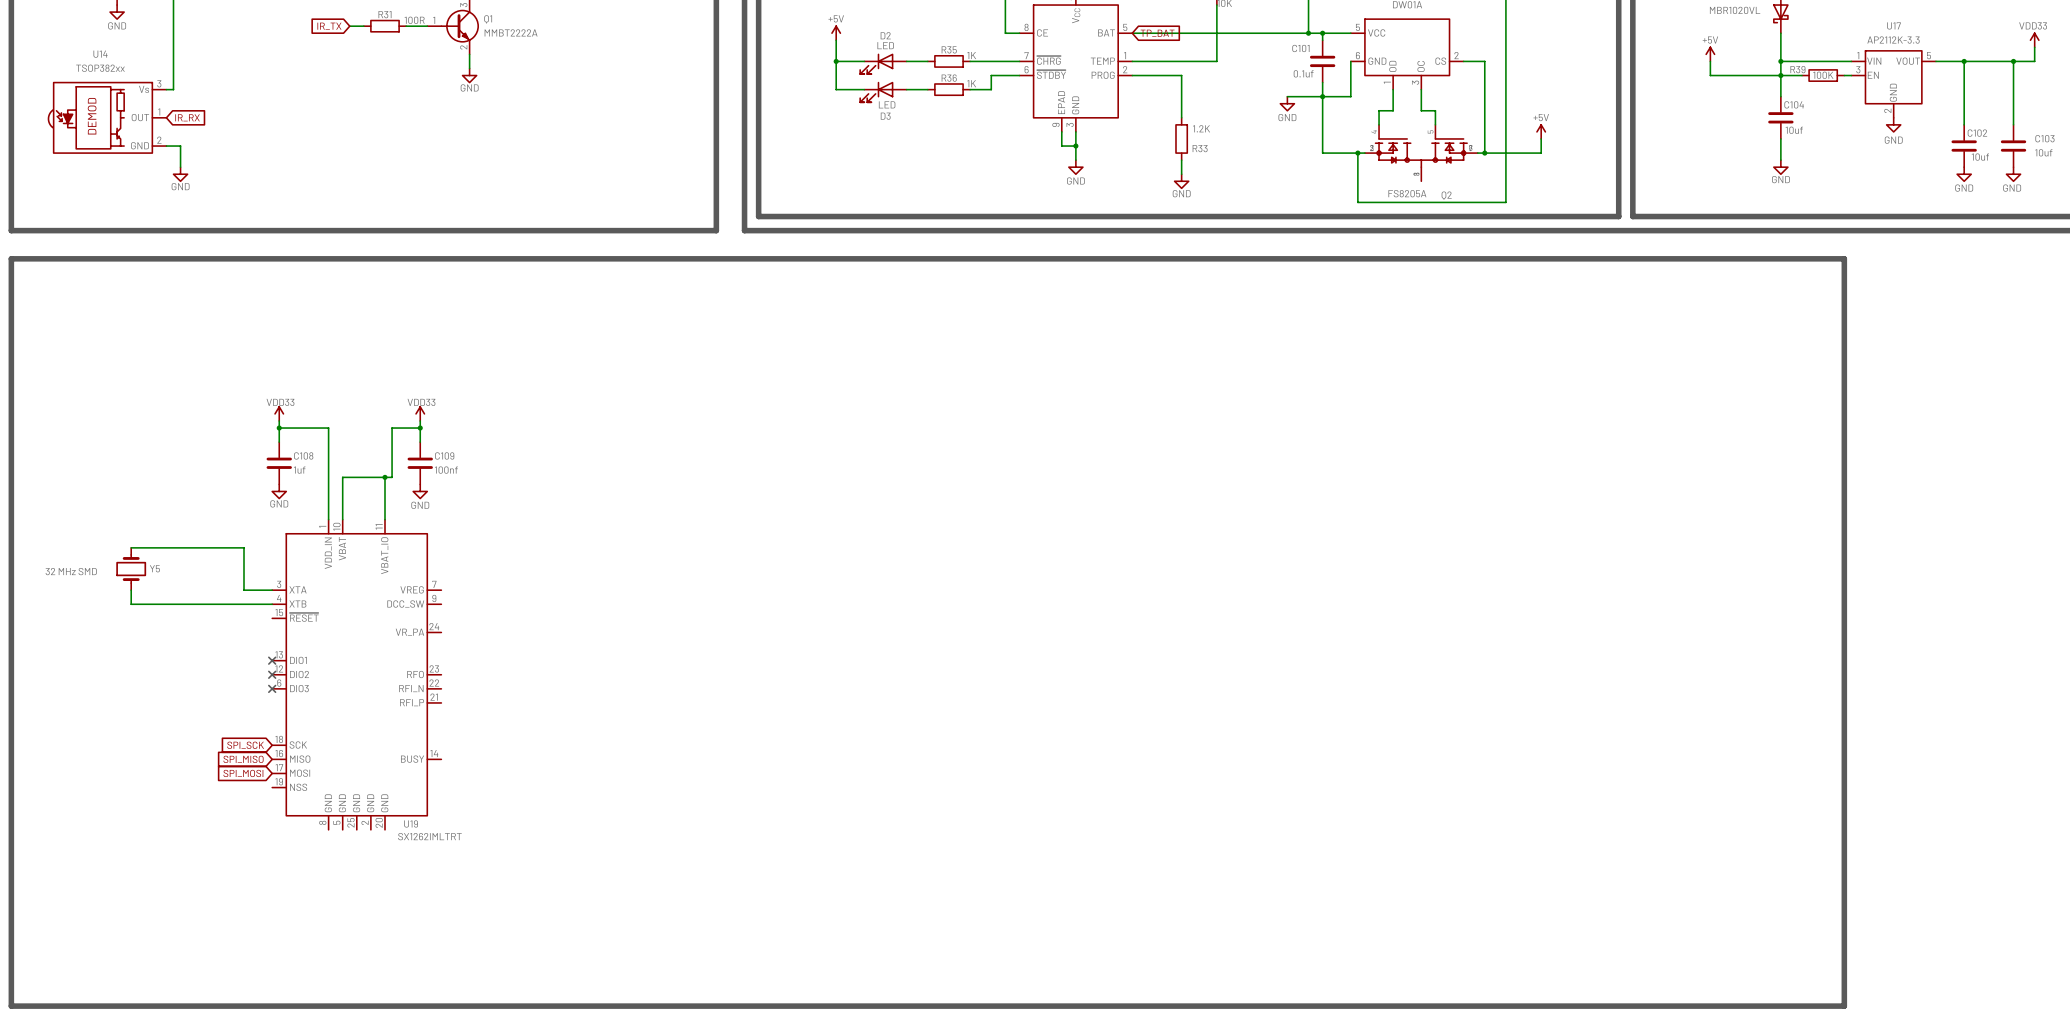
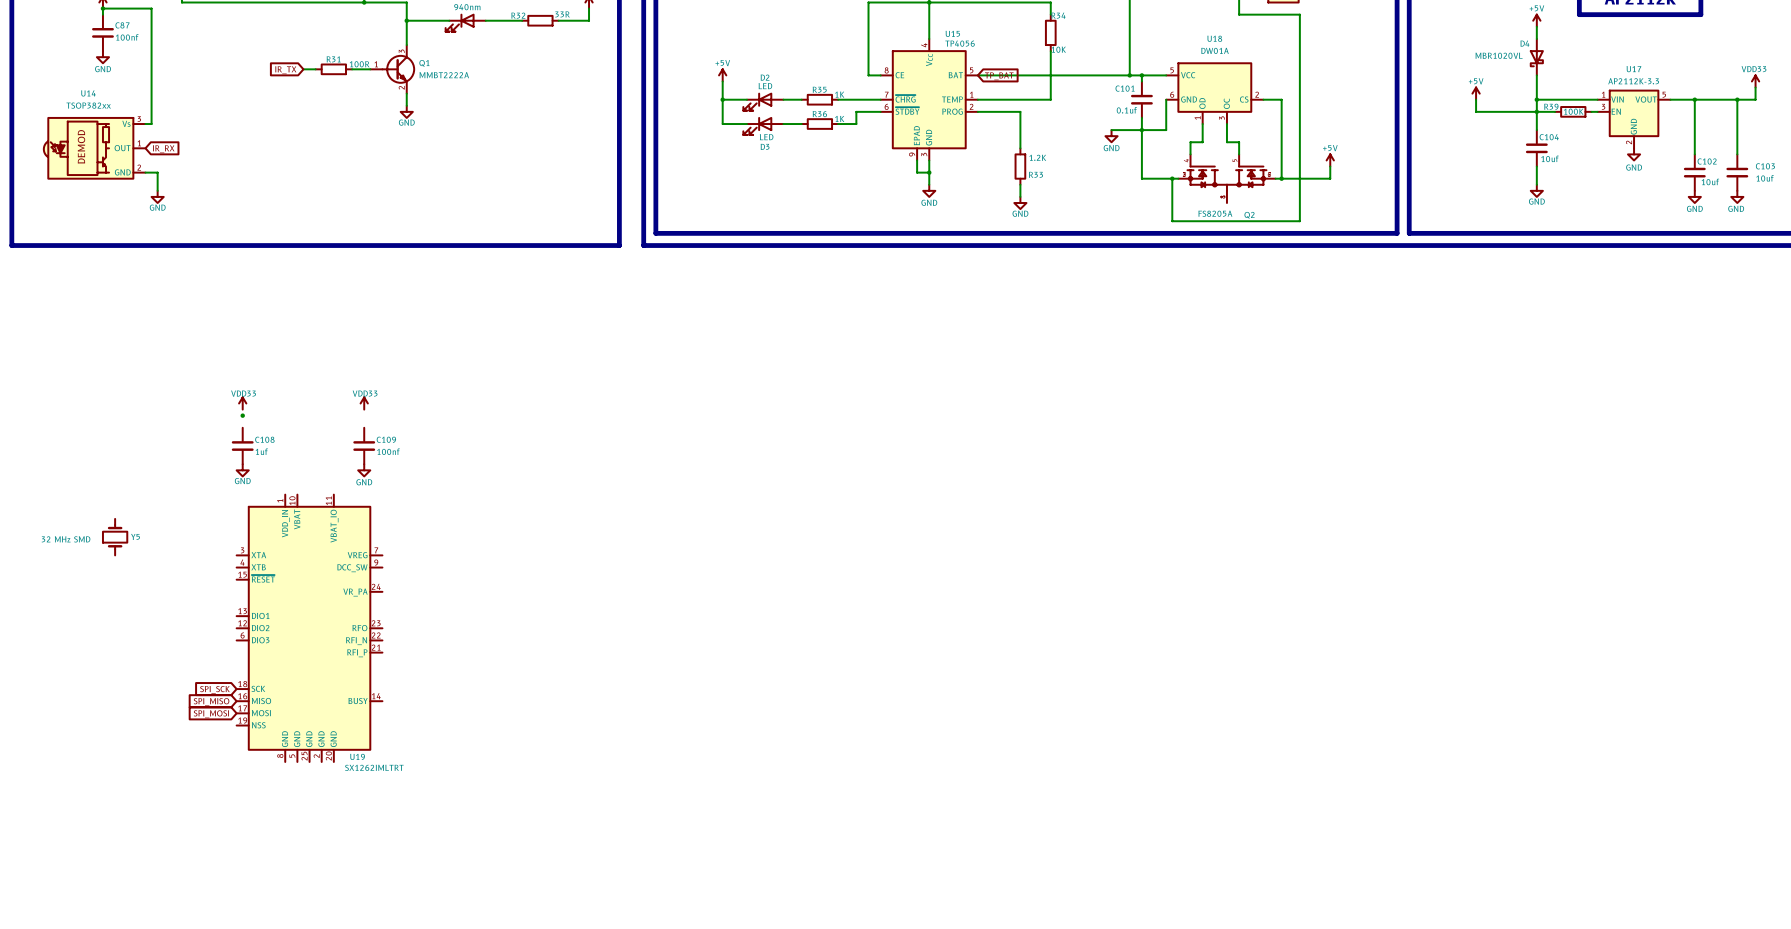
line: (11, 258) (11, 1006) (1844, 1006) (1844, 258) (11, 258) -> none
wire: (279, 420) (279, 442) -> none
wire: (420, 420) (420, 442) -> none
wire: (279, 428) (328, 428) (328, 519) -> none
wire: (420, 428) (392, 428) (392, 477) (342, 477) (342, 519) -> none
junction: (420, 428) -> none
wire: (384, 477) (384, 519) -> none
junction: (384, 477) -> none
wire: (131, 547) (244, 547) (244, 590) (272, 590) -> none
wire: (131, 590) (131, 604) (272, 604) -> none
no-connect mark: (272, 660) -> none
no-connect mark: (272, 674) -> none
no-connect mark: (272, 688) -> none

